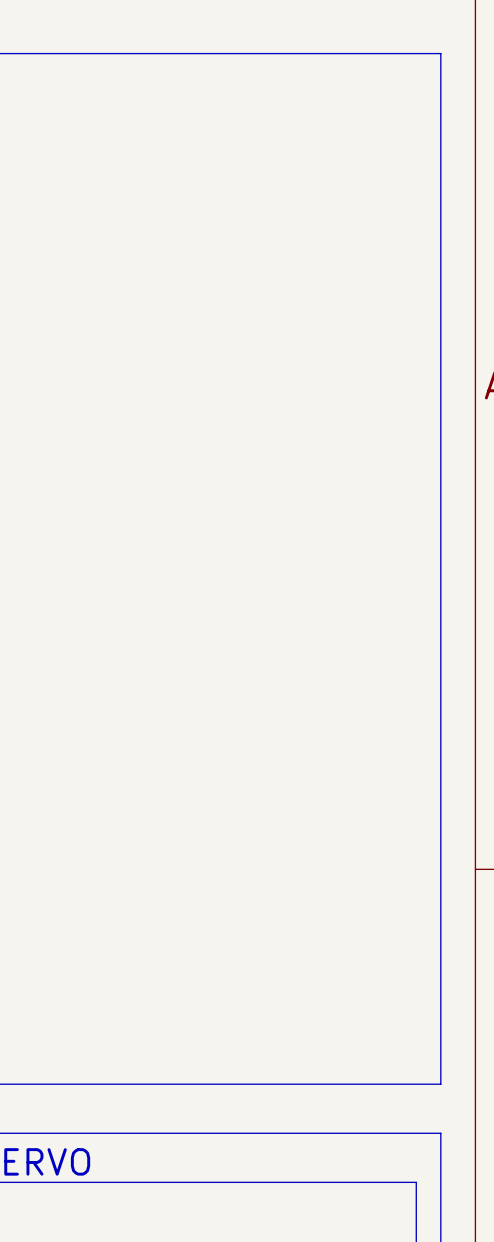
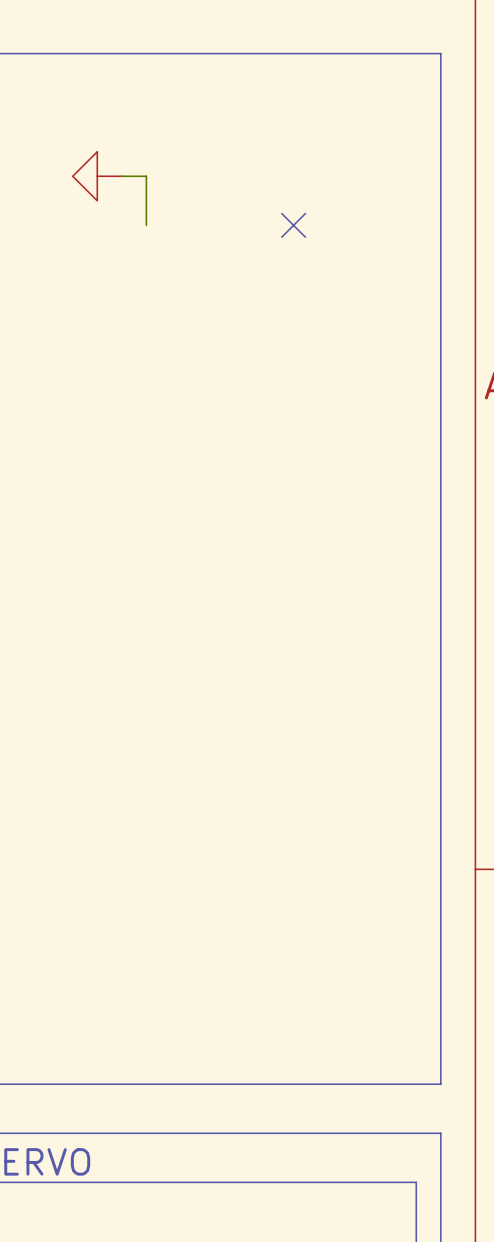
power symbol: none -> (97, 176)
wire: none -> (121, 176) (146, 176) (146, 225)
no-connect mark: none -> (293, 225)

